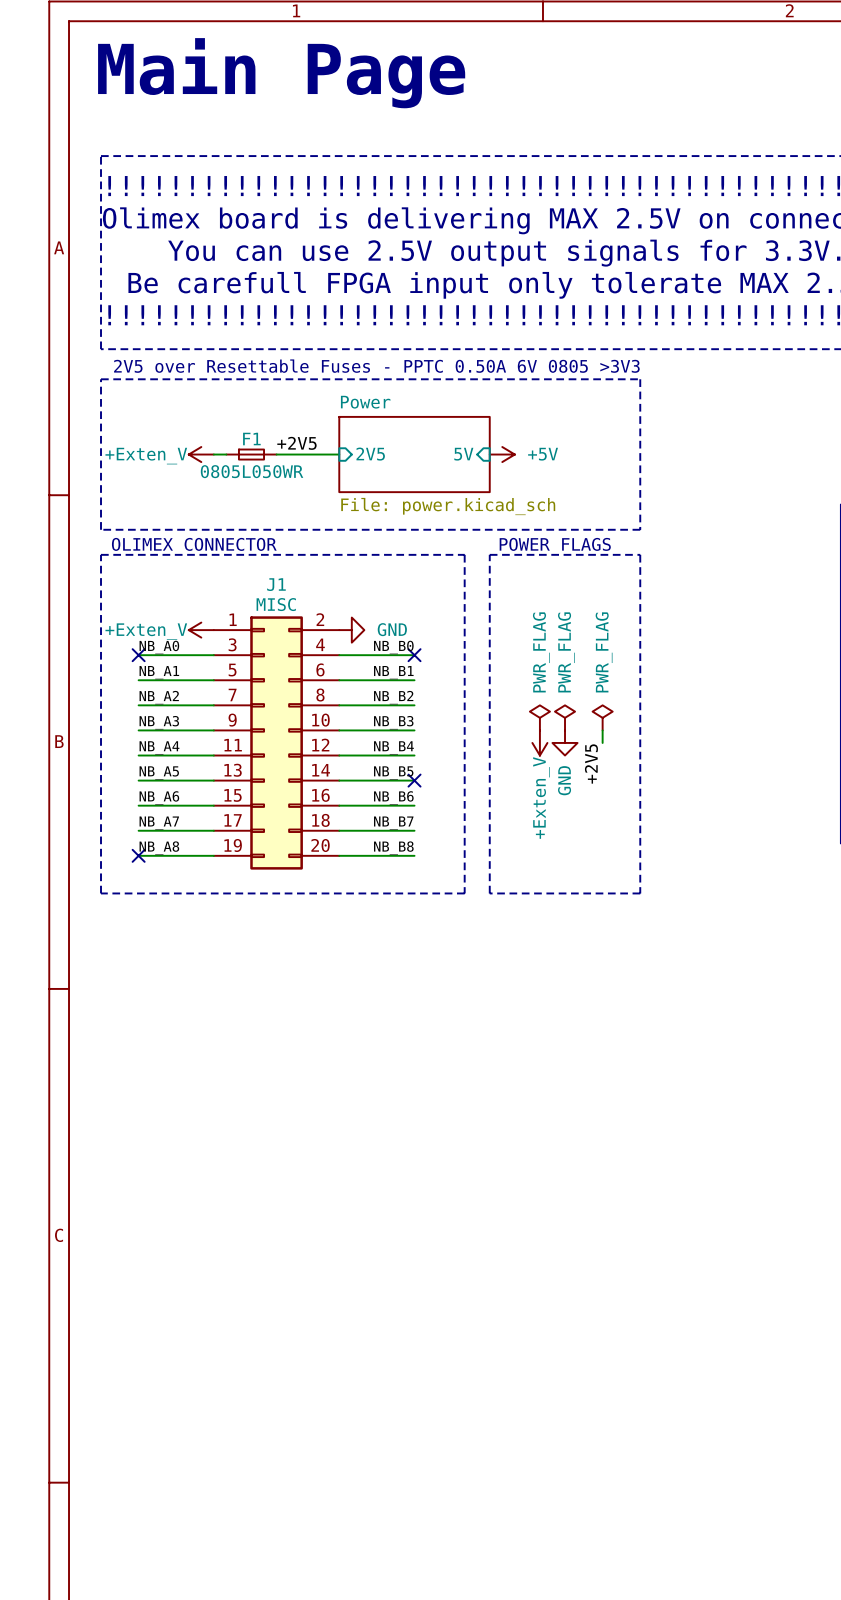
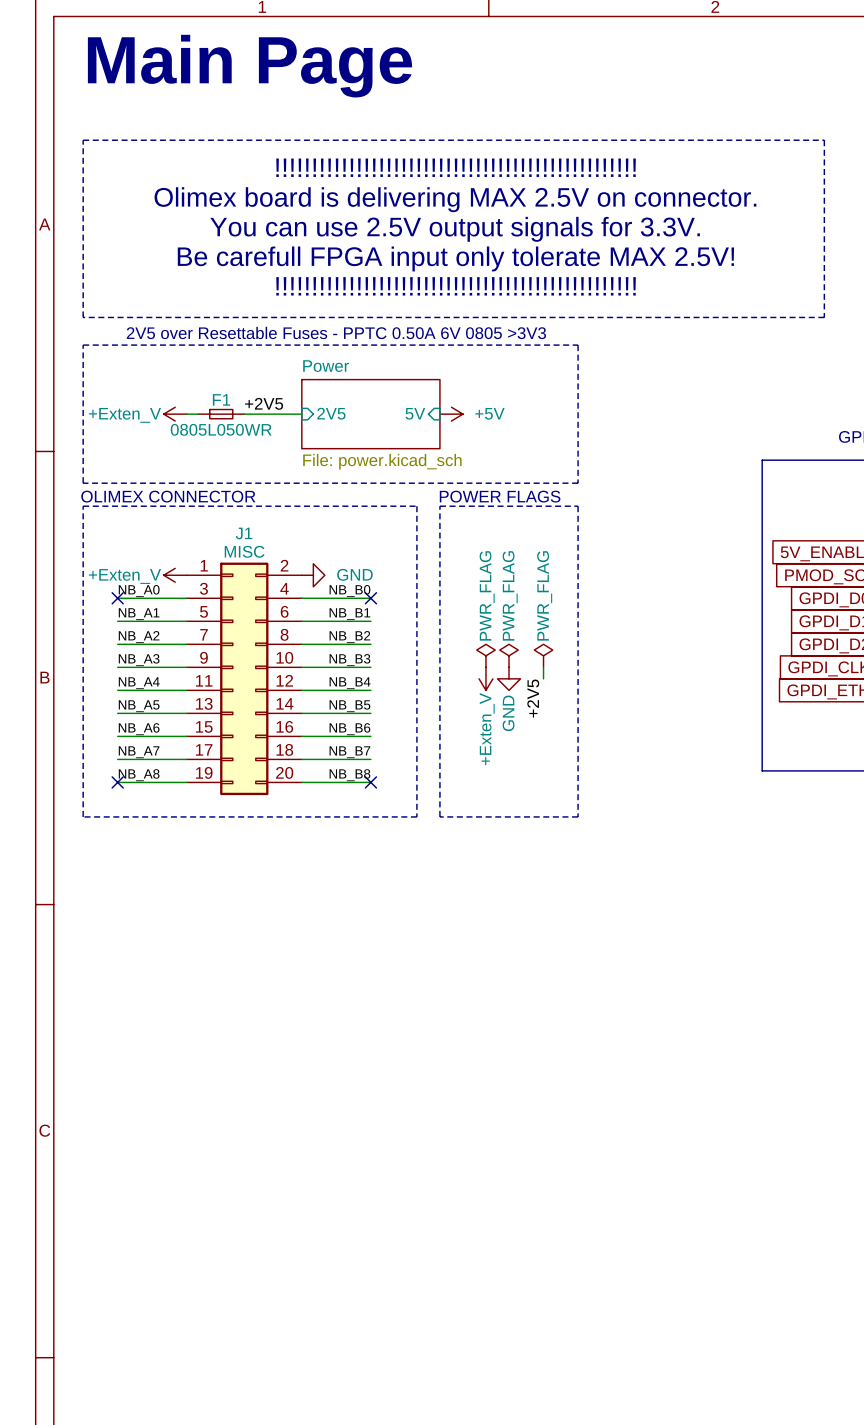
no-connect mark: (414, 780) -> none
no-connect mark: none -> (370, 782)

